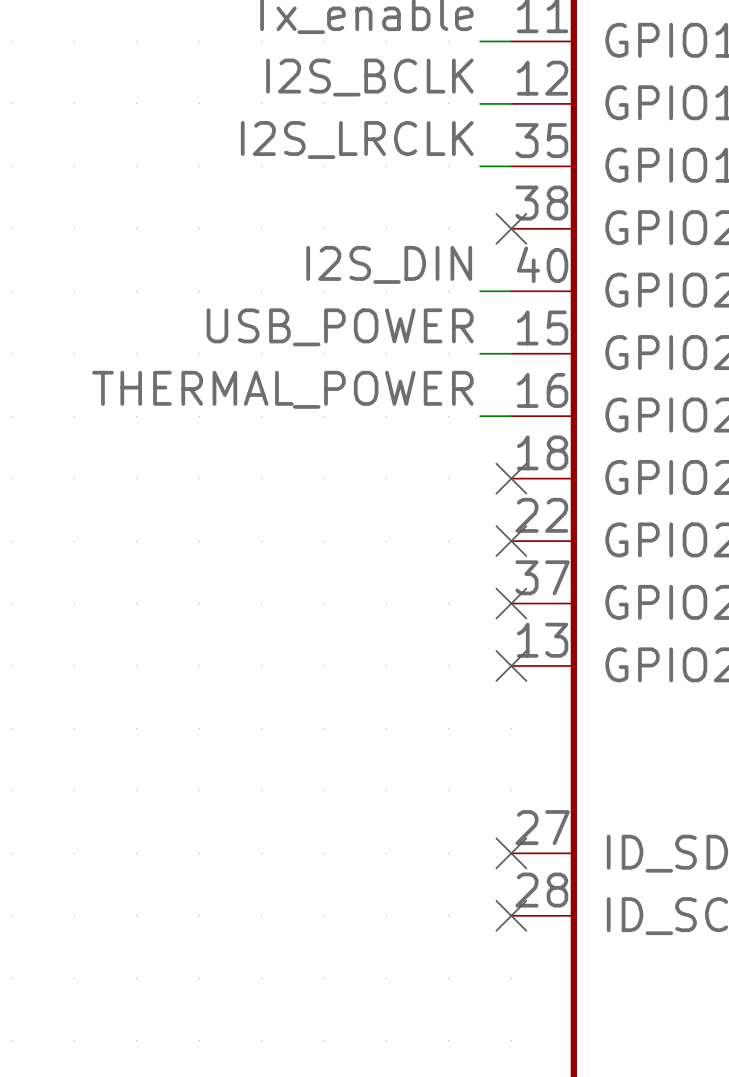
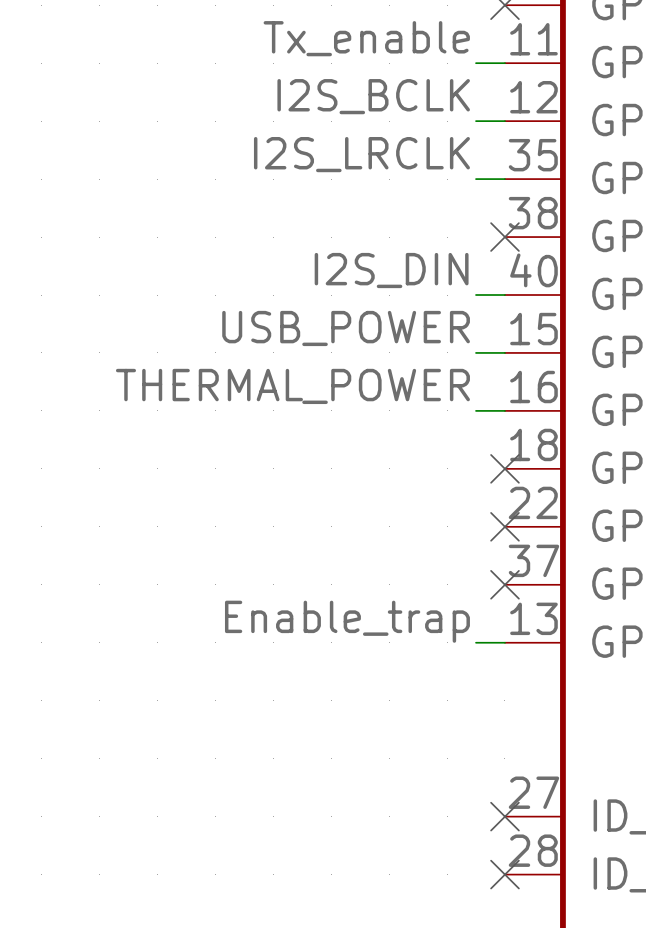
label: none -> Enable_trap (347, 621)
wire: none -> (476, 642) (504, 642)
no-connect mark: (511, 665) -> none

